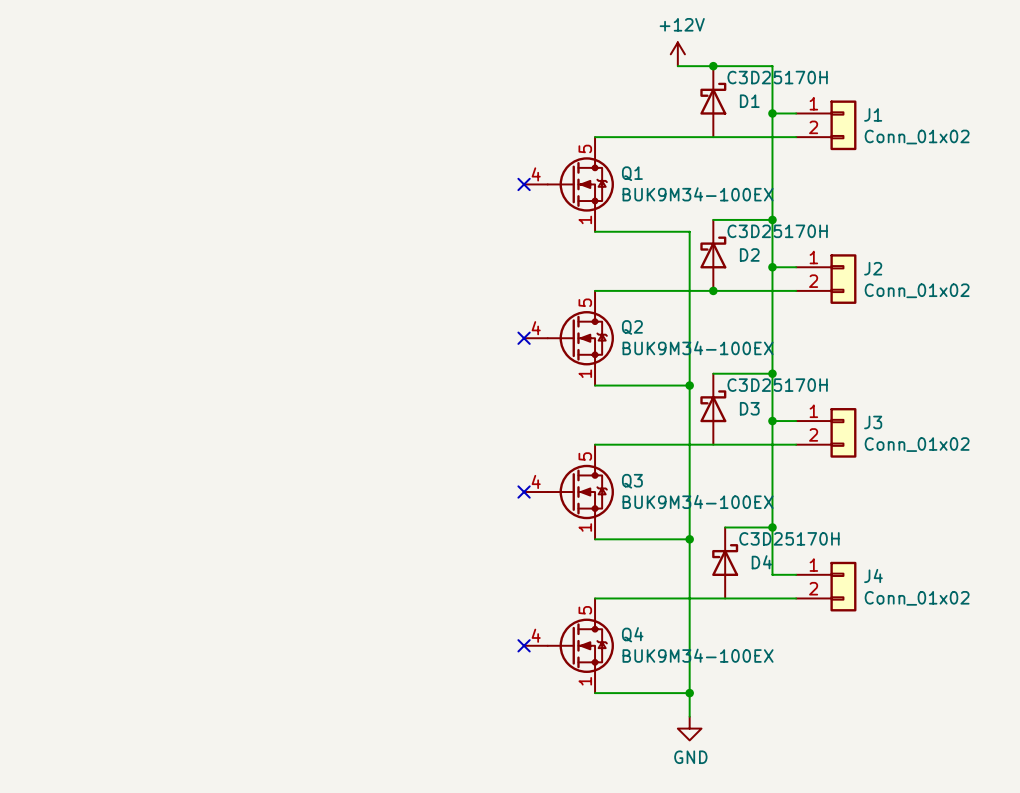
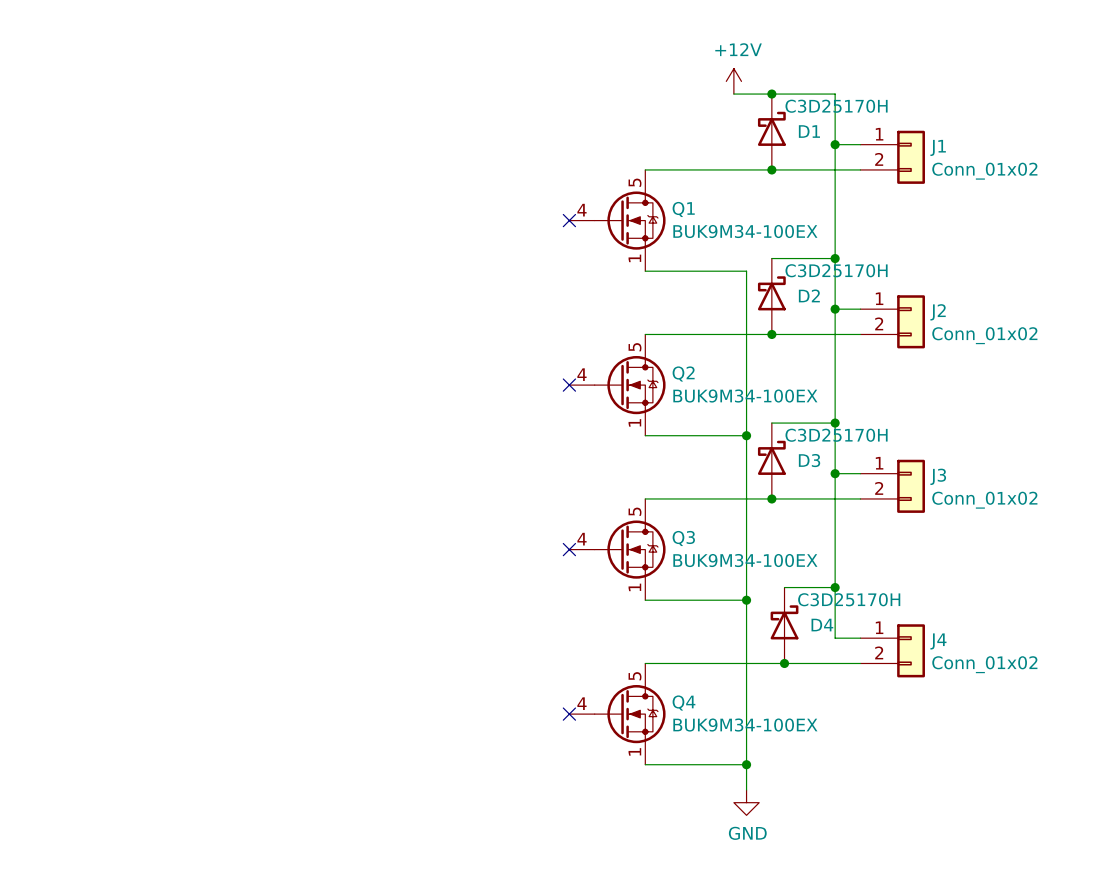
junction: none -> (771, 169)
junction: none -> (771, 498)
junction: none -> (784, 663)

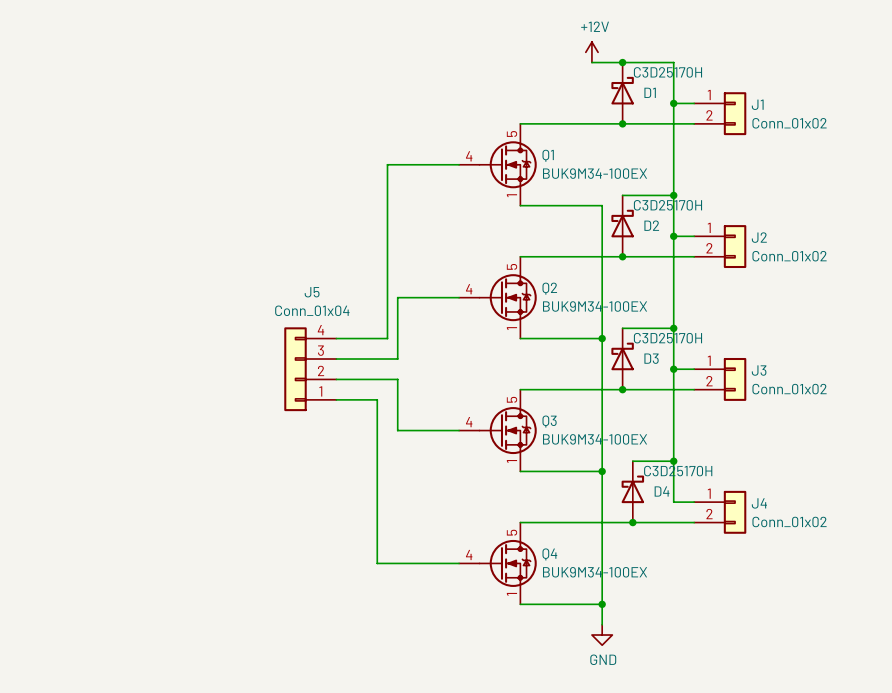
wire: none -> (459, 164) (387, 164) (387, 338) (336, 338)
no-connect mark: (569, 220) -> none
wire: none -> (459, 297) (397, 297) (397, 359) (336, 359)
no-connect mark: (569, 385) -> none
J5: none -> Conn_01x04 (310, 369)
wire: none -> (336, 379) (397, 379) (397, 430) (459, 430)
wire: none -> (336, 399) (377, 399) (377, 563) (459, 563)
no-connect mark: (569, 549) -> none
no-connect mark: (569, 714) -> none

